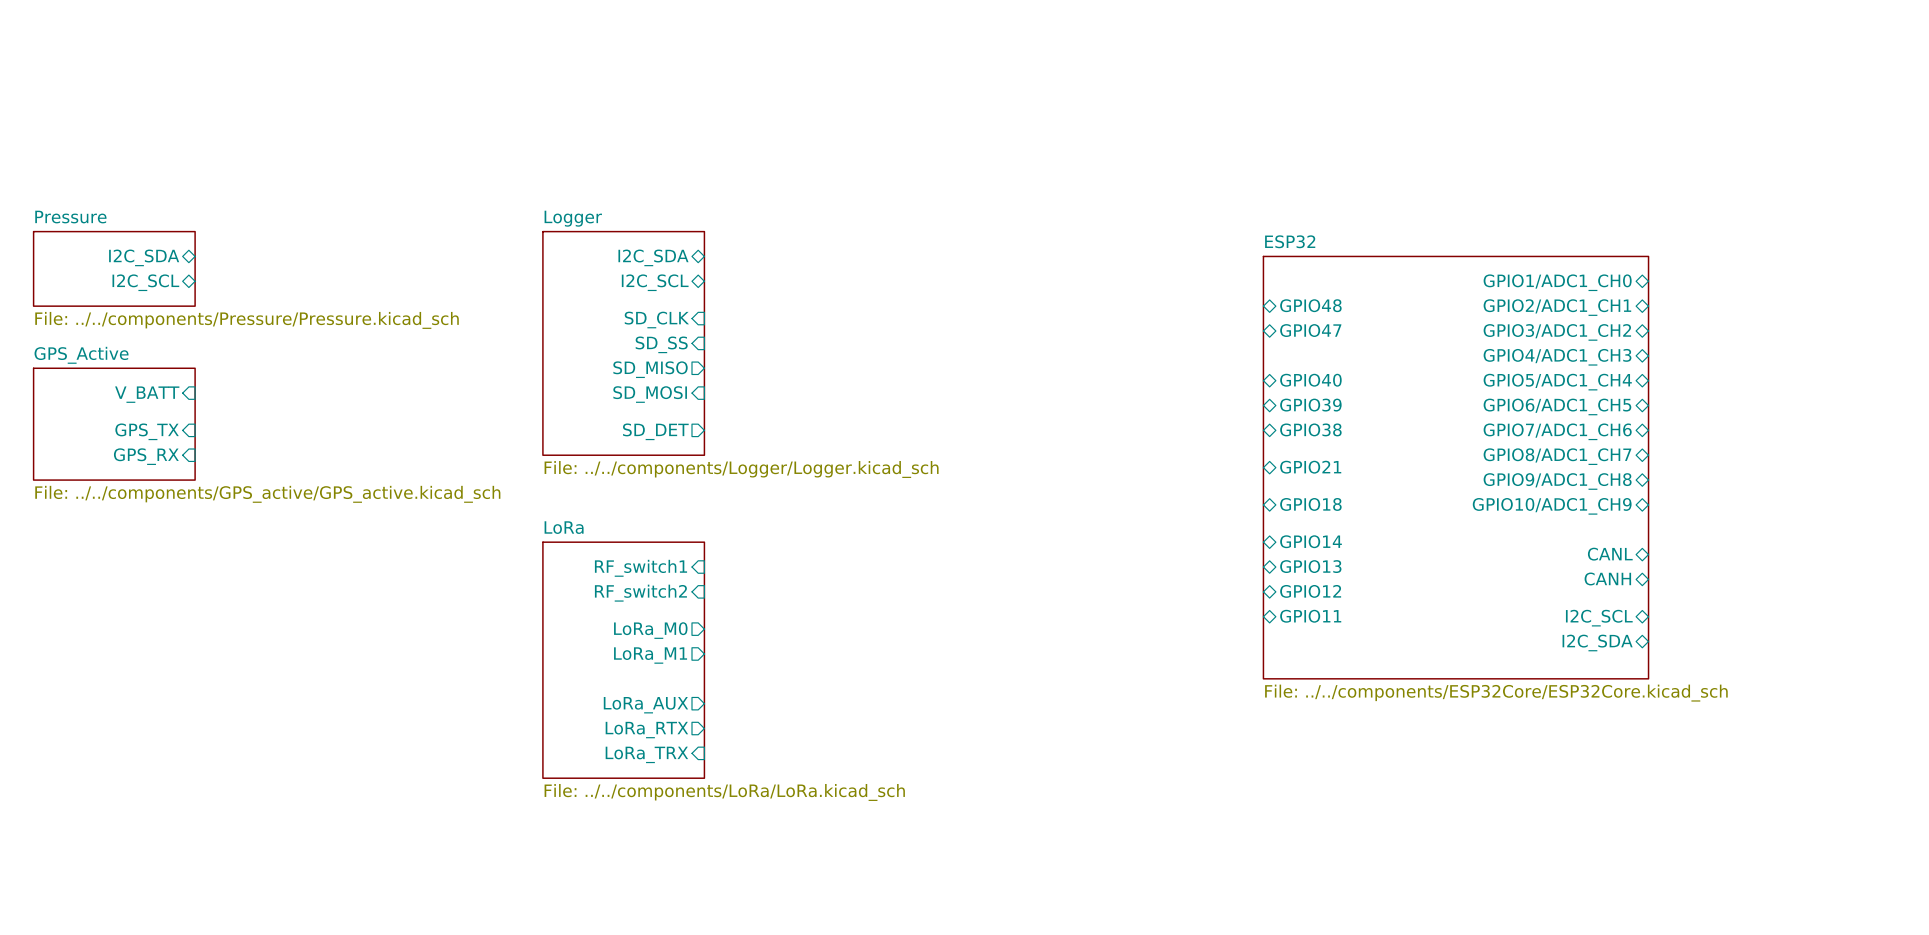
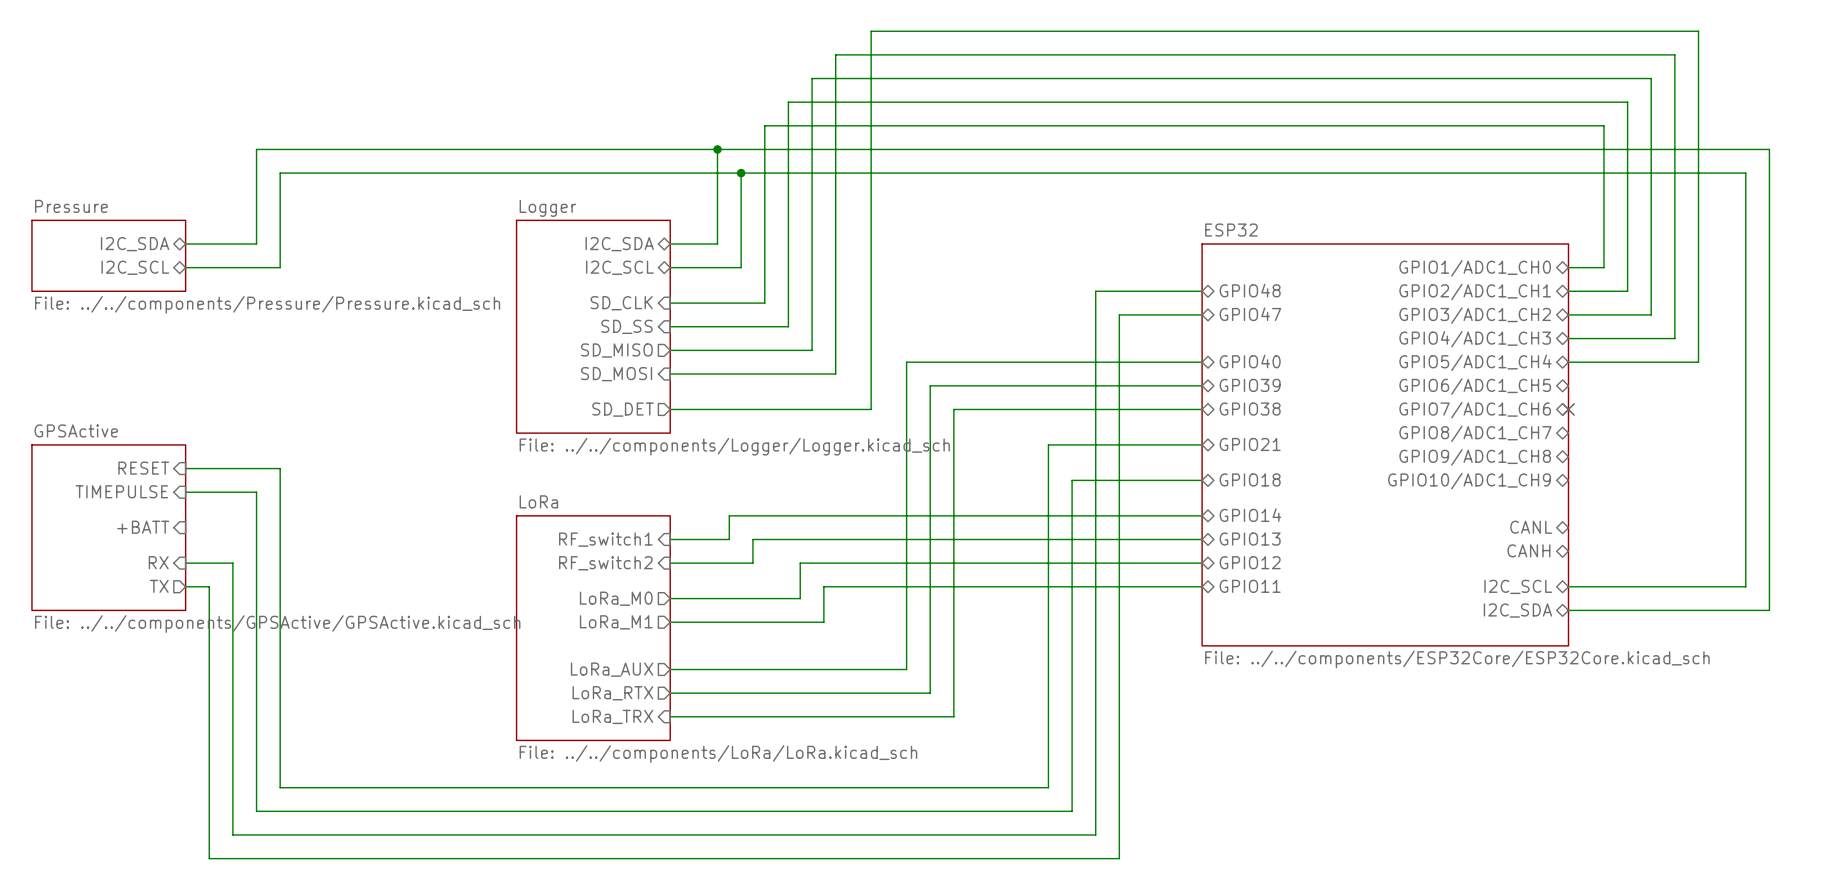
wire: none -> (717, 149) (717, 244) (670, 244)
junction: none -> (717, 149)
wire: none -> (741, 173) (741, 267) (670, 267)
junction: none -> (741, 173)
wire: none -> (185, 244) (256, 244) (256, 149) (1769, 149) (1769, 610) (1568, 610)
wire: none -> (185, 267) (280, 267) (280, 173) (1745, 173) (1745, 586) (1568, 586)
wire: none -> (1568, 267) (1603, 267) (1603, 125) (764, 125) (764, 303) (670, 303)
wire: none -> (1202, 291) (1095, 291) (1095, 834) (232, 834) (232, 563) (185, 563)
wire: none -> (1568, 291) (1627, 291) (1627, 102) (788, 102) (788, 326) (670, 326)
wire: none -> (1202, 314) (1119, 314) (1119, 858) (209, 858) (209, 586) (185, 586)
wire: none -> (1568, 314) (1651, 314) (1651, 78) (812, 78) (812, 350) (670, 350)
wire: none -> (1568, 338) (1674, 338) (1674, 54) (835, 54) (835, 374) (670, 374)
wire: none -> (1202, 362) (906, 362) (906, 669) (670, 669)
wire: none -> (1568, 362) (1698, 362) (1698, 31) (871, 31) (871, 409) (670, 409)
sheet pin: V_BATT (147, 394) -> none
wire: none -> (1202, 385) (930, 385) (930, 693) (670, 693)
sheet GPS_Active: File: ../../components/GPS_active/GPS_active.kicad_sch (114, 424) -> none
wire: none -> (1202, 409) (953, 409) (953, 716) (670, 716)
no-connect mark: none -> (1568, 409)
sheet pin: GPS_TX (147, 431) -> none
sheet pin: GPS_RX (146, 456) -> none
wire: none -> (1202, 444) (1048, 444) (1048, 787) (280, 787) (280, 468) (185, 468)
sheet pin: none -> RESET (143, 468)
wire: none -> (1202, 480) (1072, 480) (1072, 811) (256, 811) (256, 492) (185, 492)
sheet pin: none -> TIMEPULSE (121, 491)
wire: none -> (1202, 515) (729, 515) (729, 539) (670, 539)
sheet GPSActive: none -> File: ../../components/GPSActive/GPSActive.kicad_sch (108, 527)
sheet pin: none -> +BATT (143, 527)
wire: none -> (1202, 539) (752, 539) (752, 563) (670, 563)
sheet pin: none -> RX (158, 562)
wire: none -> (1202, 563) (800, 563) (800, 598) (670, 598)
sheet pin: none -> TX (159, 586)
wire: none -> (1202, 586) (823, 586) (823, 622) (670, 622)

